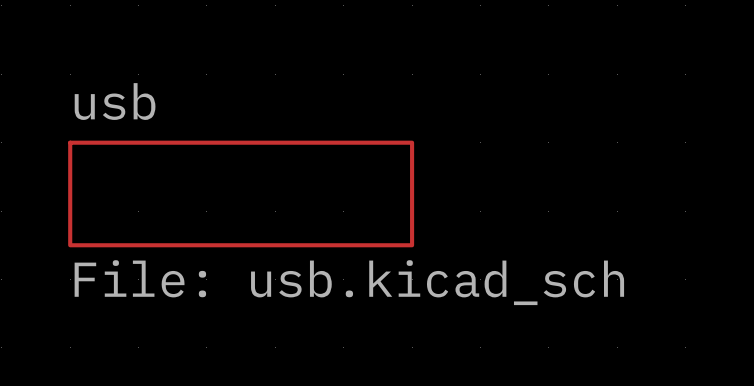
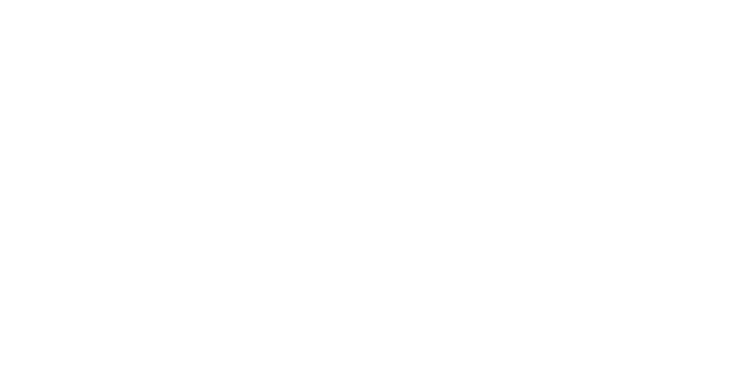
sheet usb: File: usb.kicad_sch (241, 193) -> none

